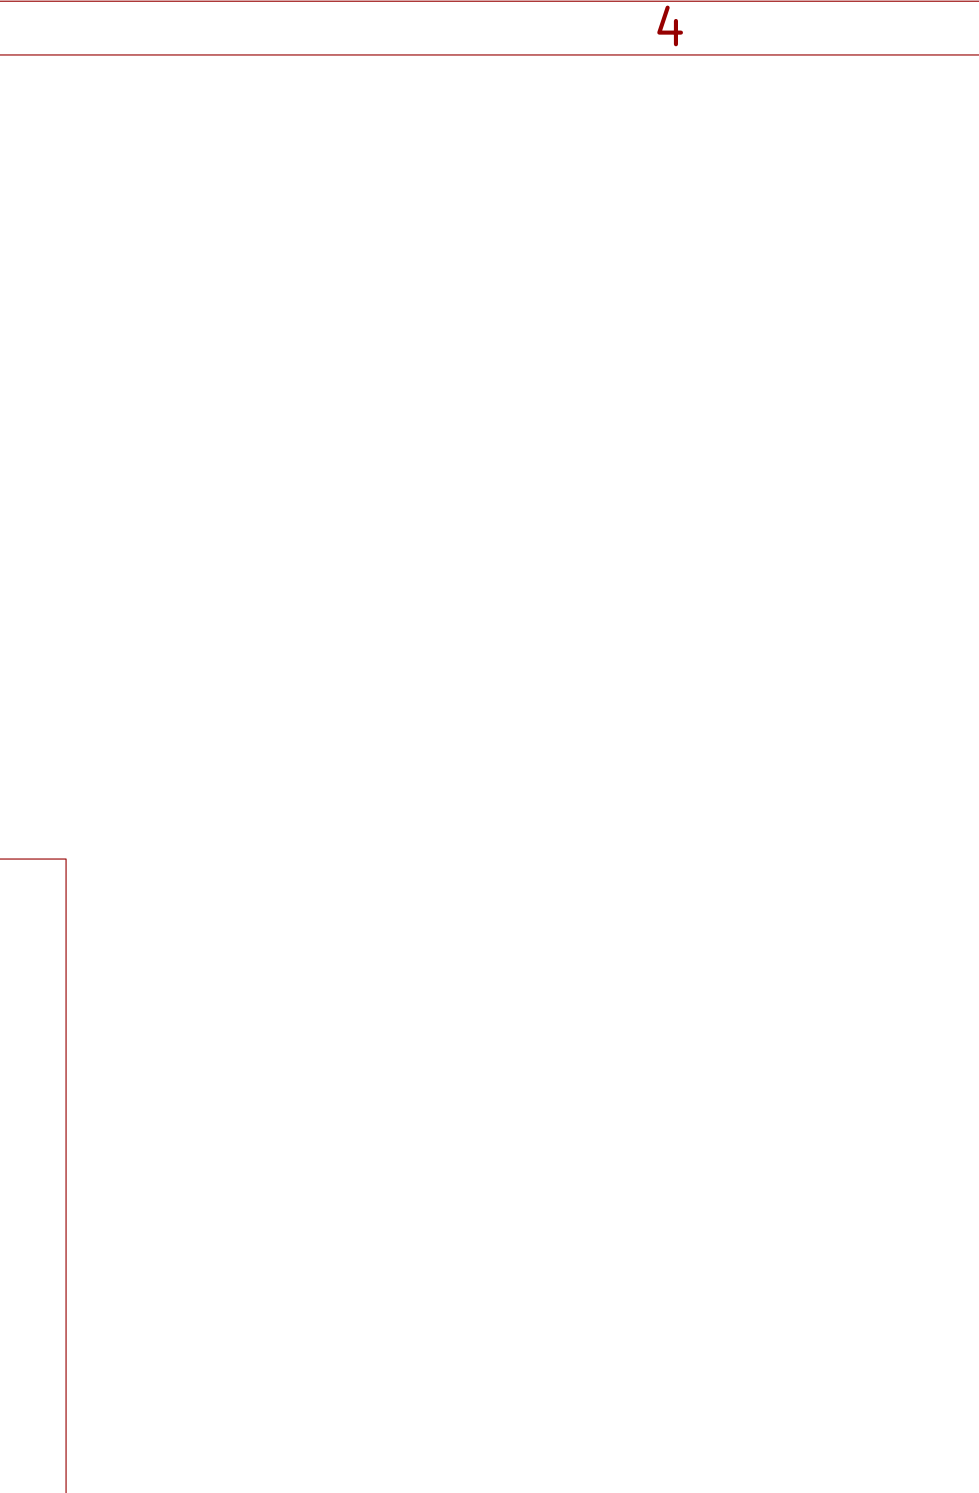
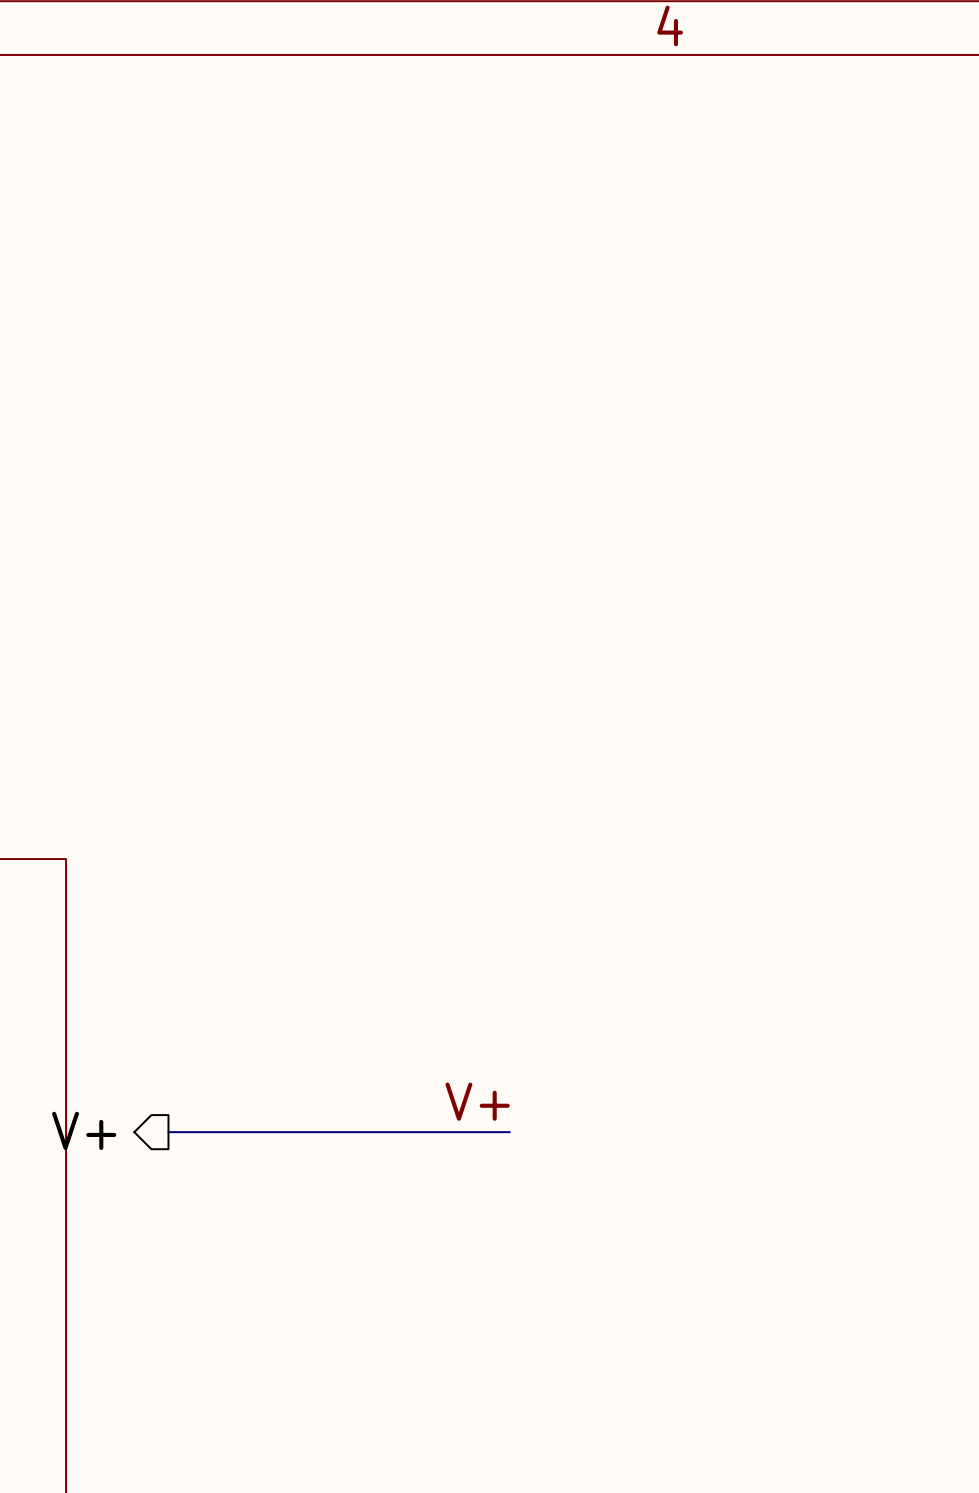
label: none -> V+ (477, 1101)
sheet pin: none -> V+ (84, 1130)
wire: none -> (168, 1132) (509, 1132)

